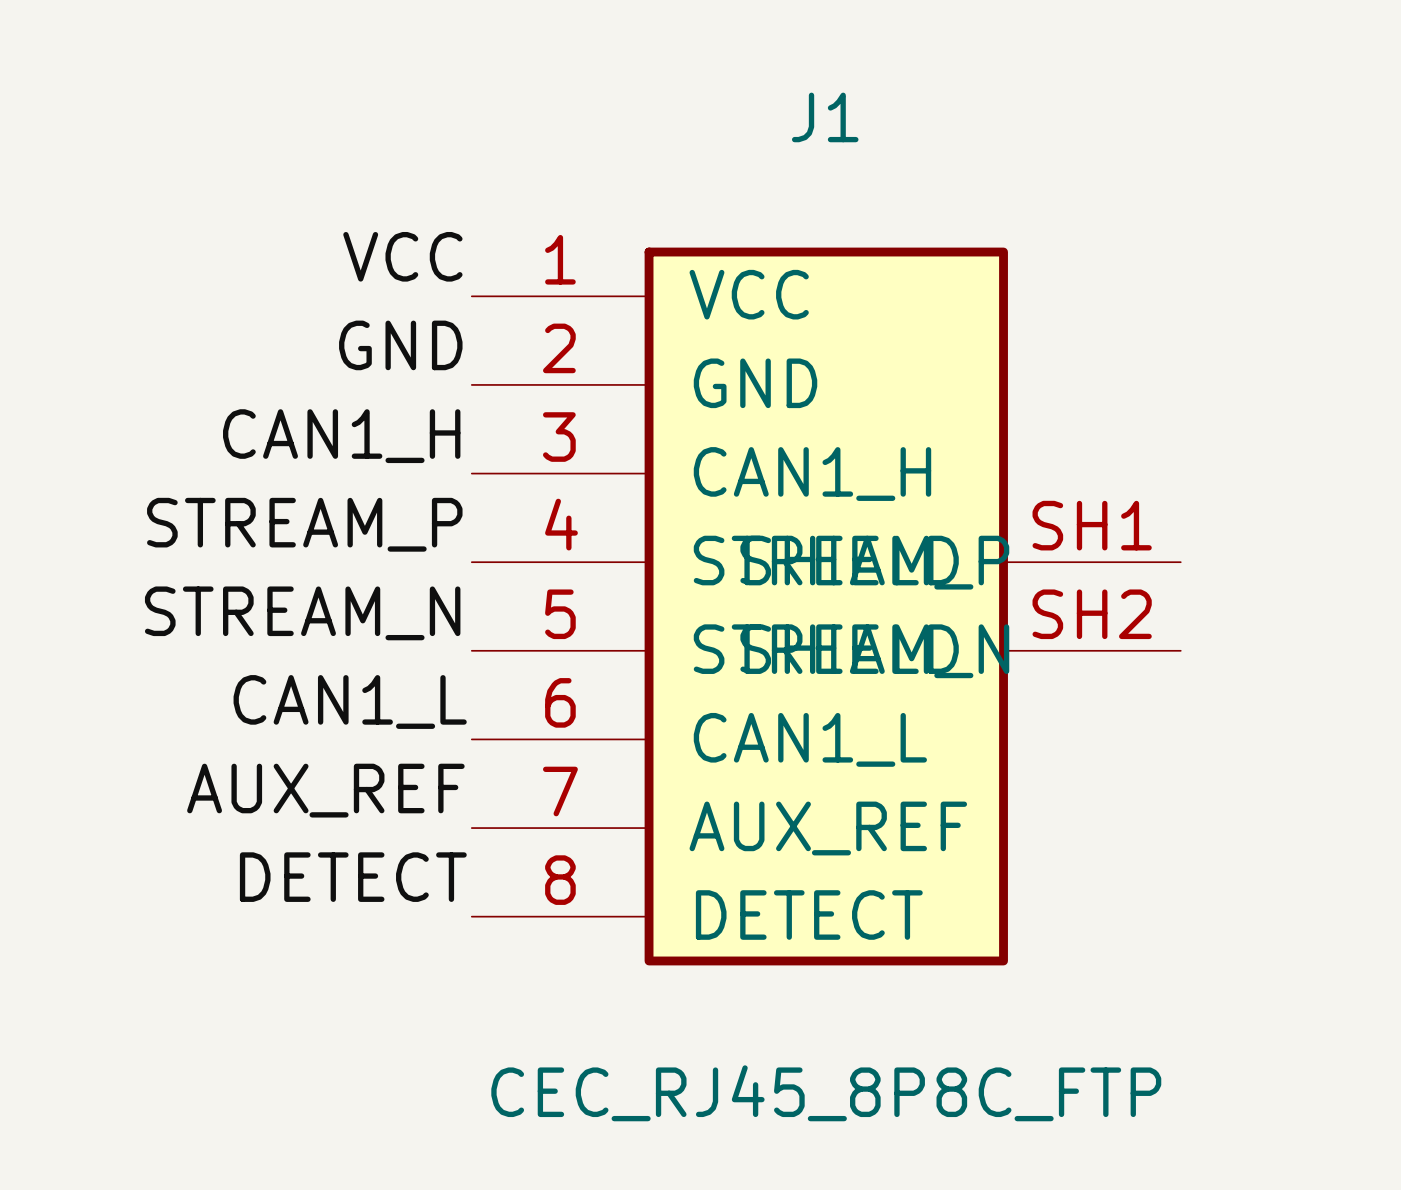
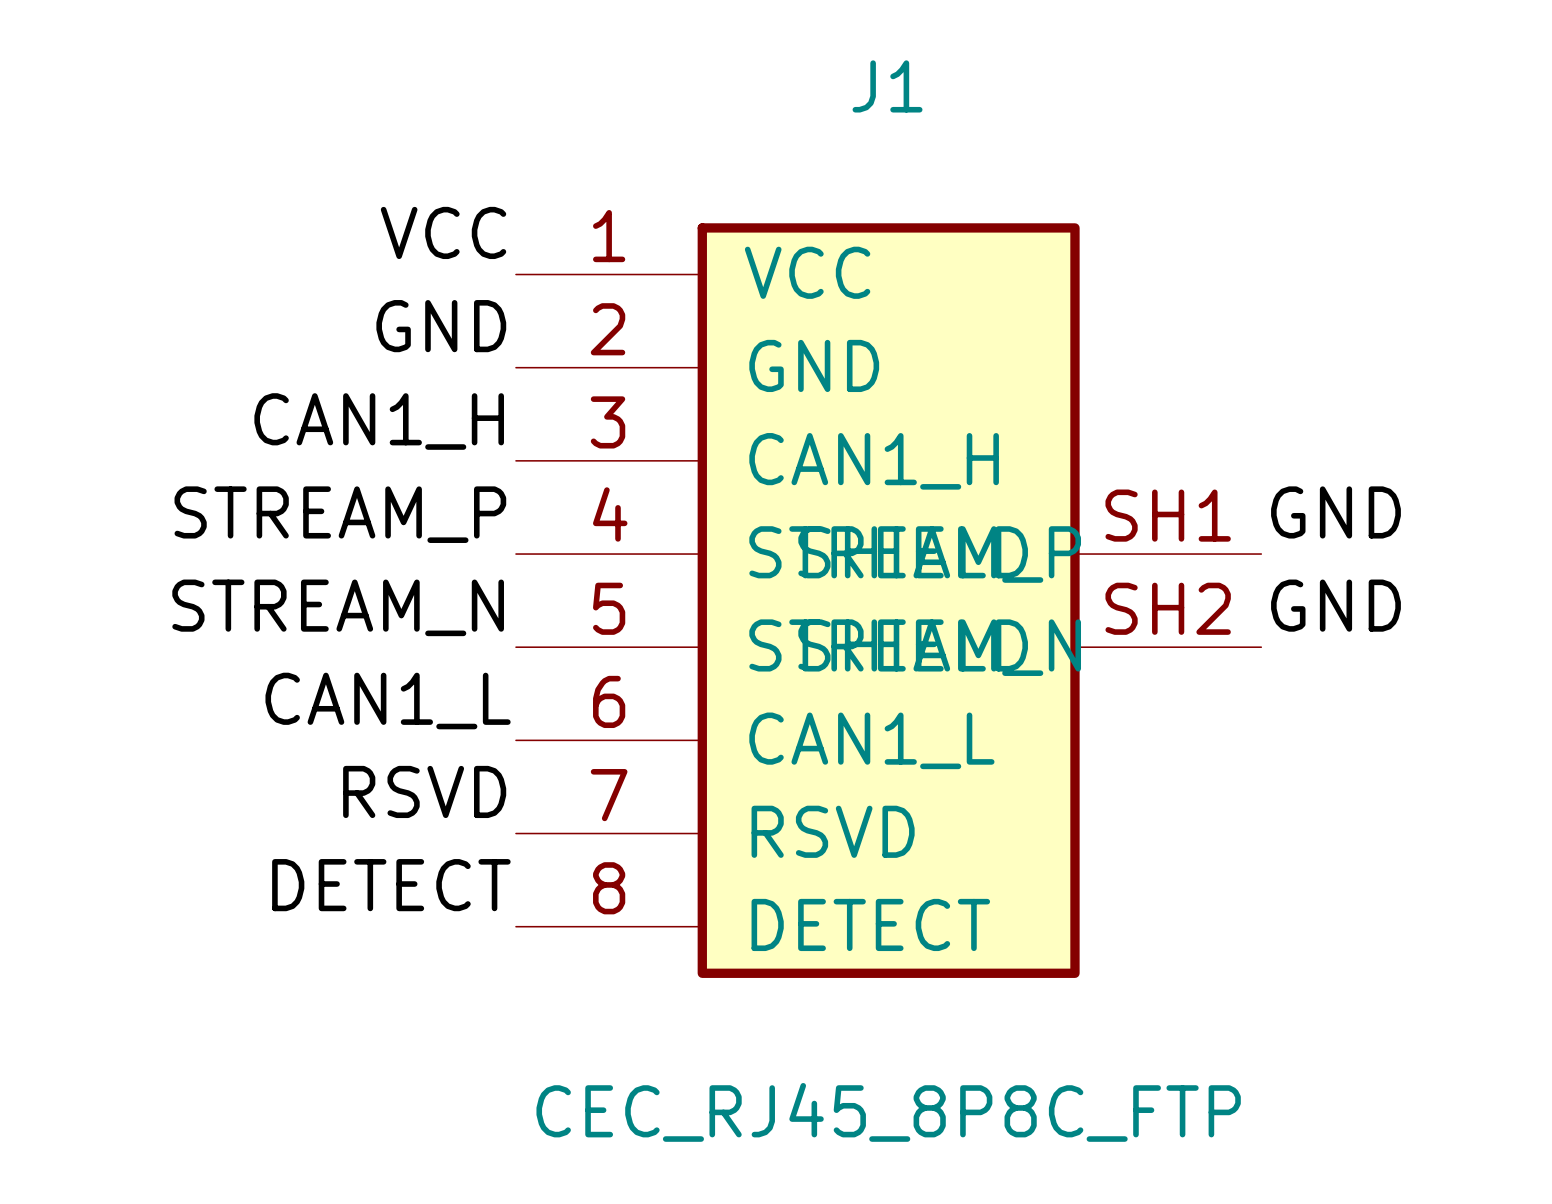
label: none -> GND (1335, 512)
label: none -> GND (1335, 605)
label: AUX_REF (325, 790) -> RSVD (424, 791)
J1 pin name: AUX_REF (828, 828) -> RSVD (833, 831)

